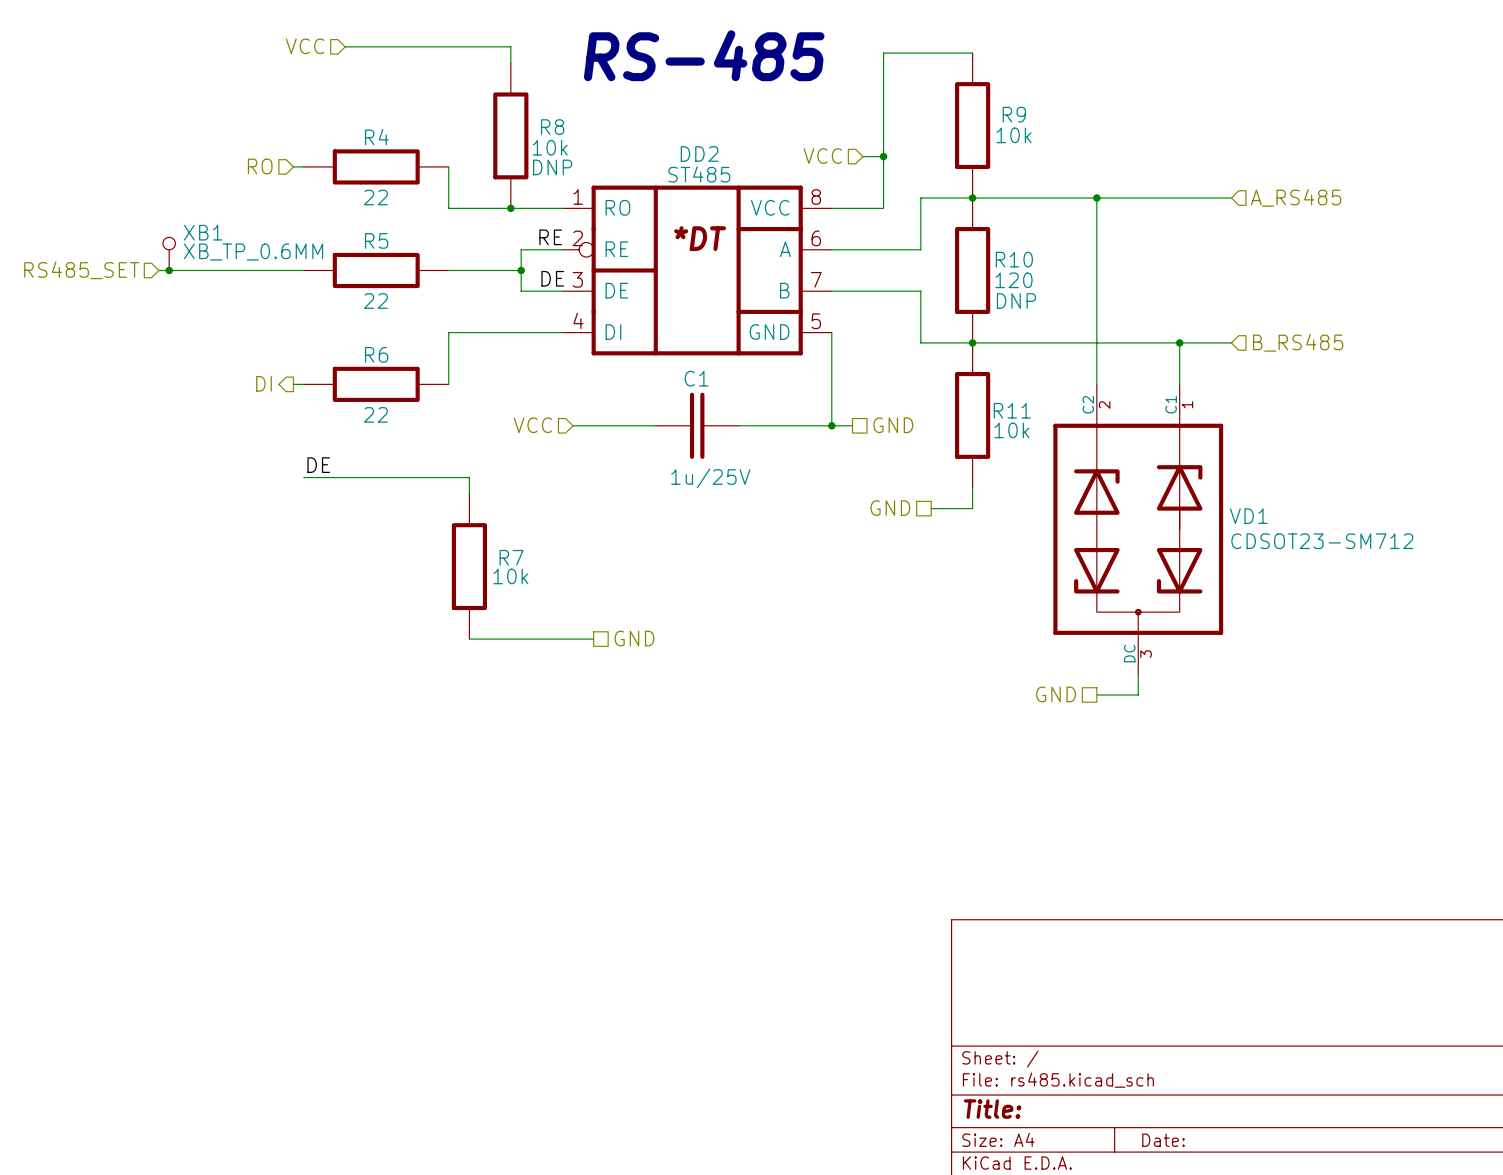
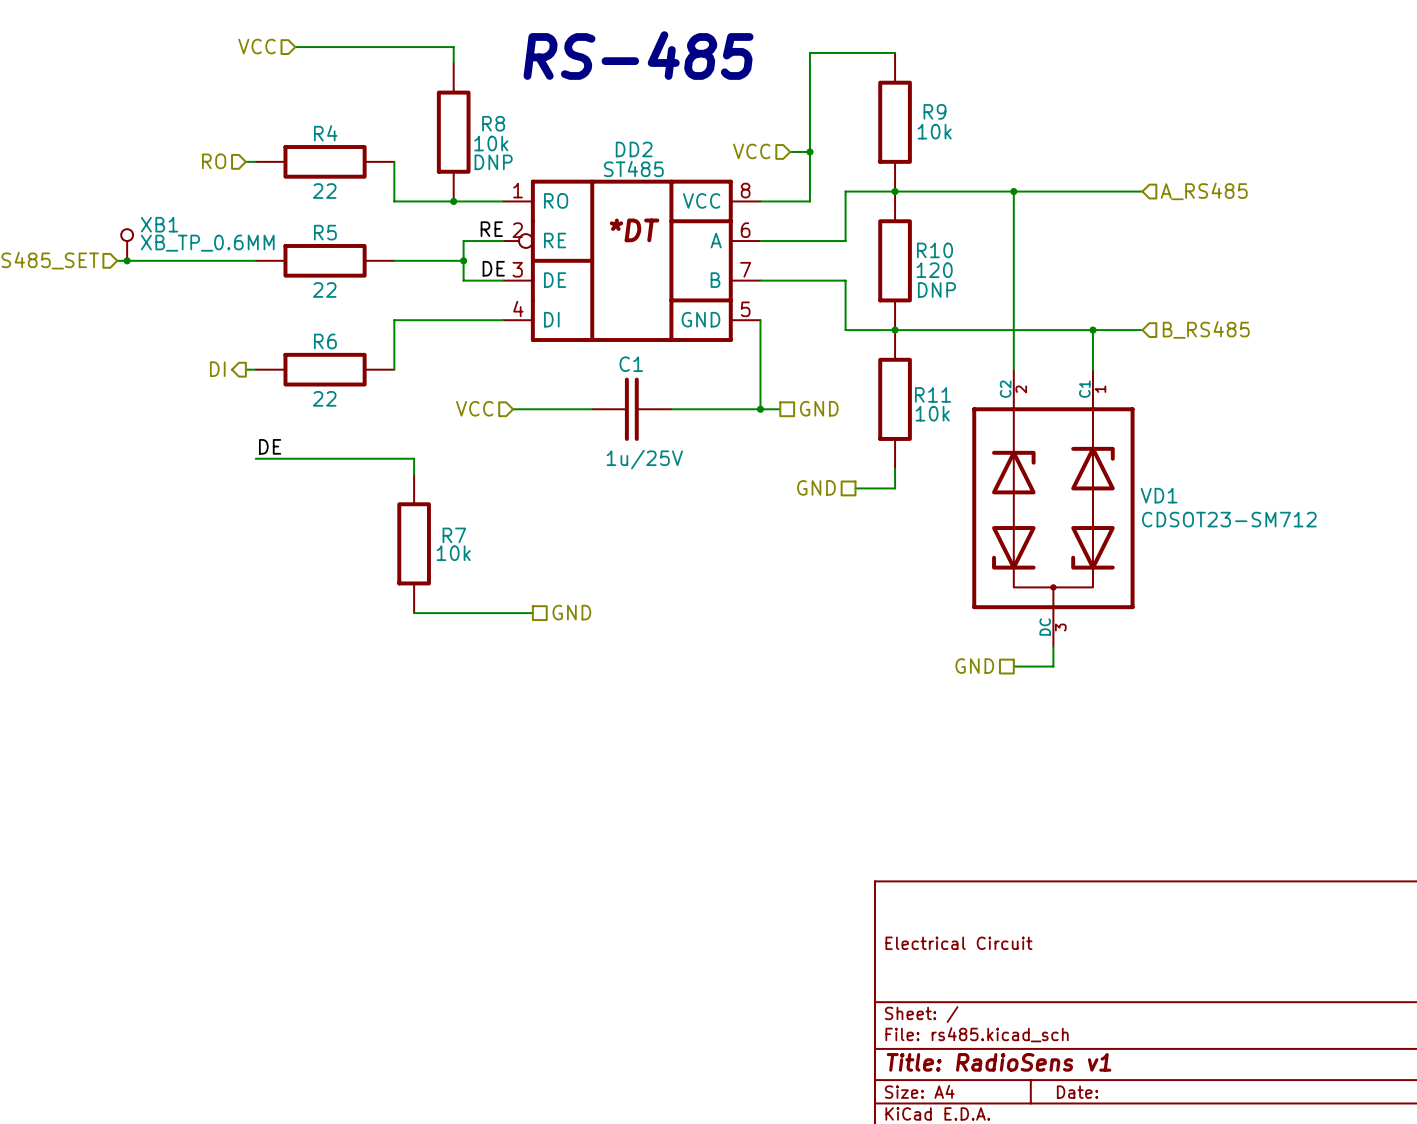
title block: none -> Electrical Circuit (958, 943)
title block: Title: (992, 1109) -> Title: RadioSens v1 (998, 1062)

